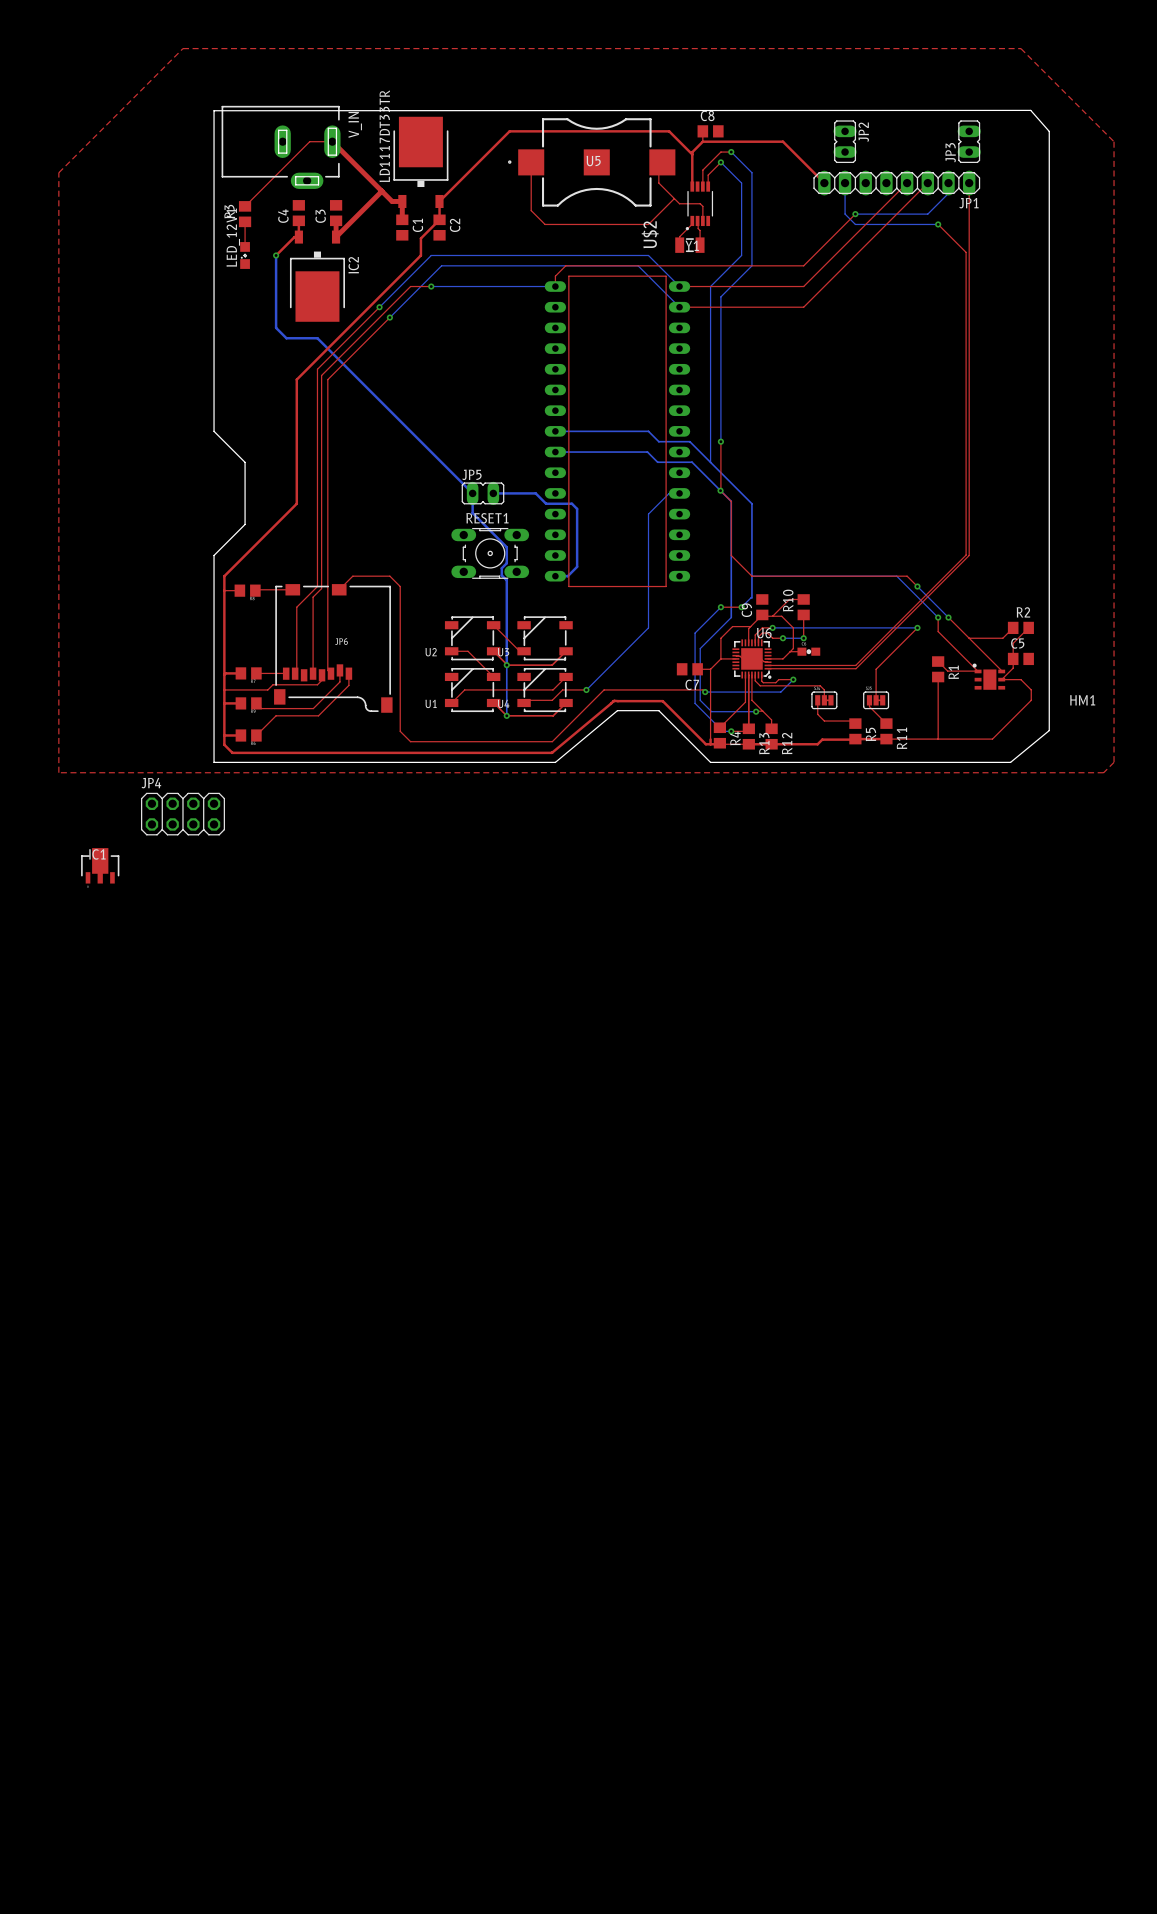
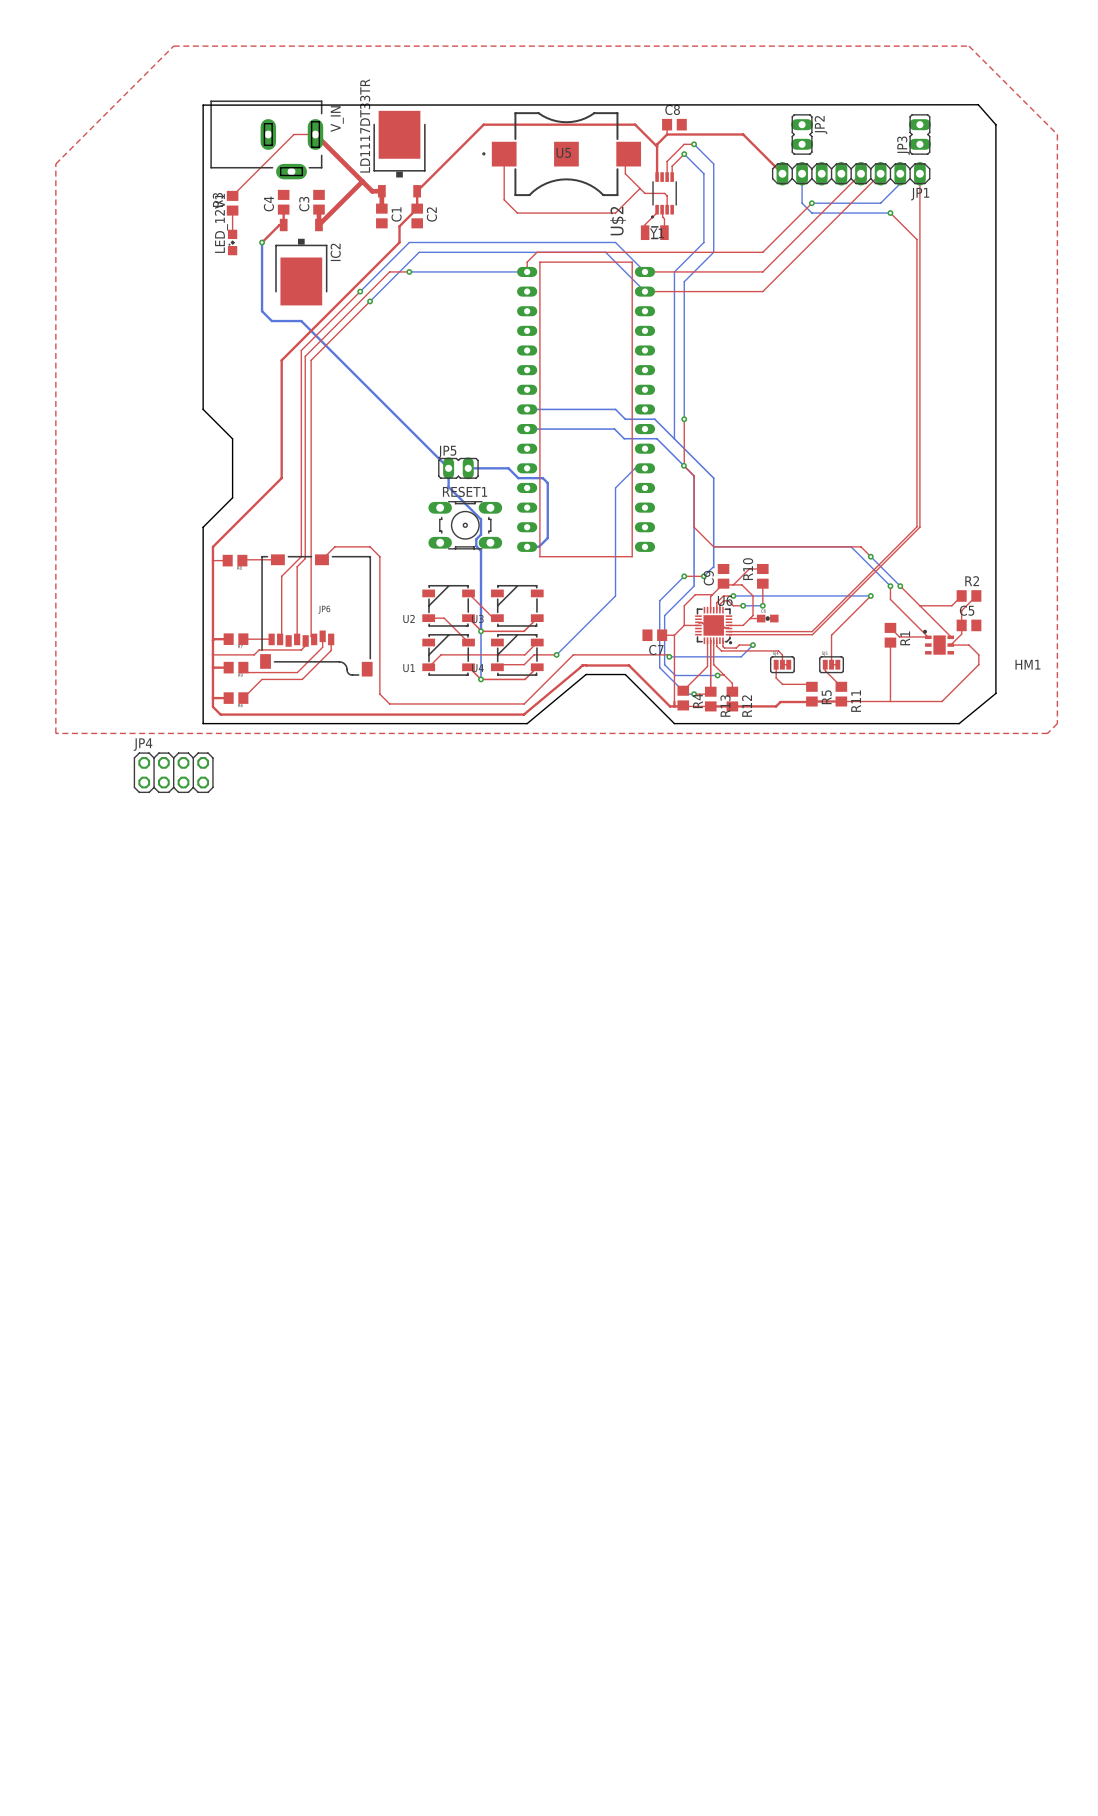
IC1: (100, 867) -> none

